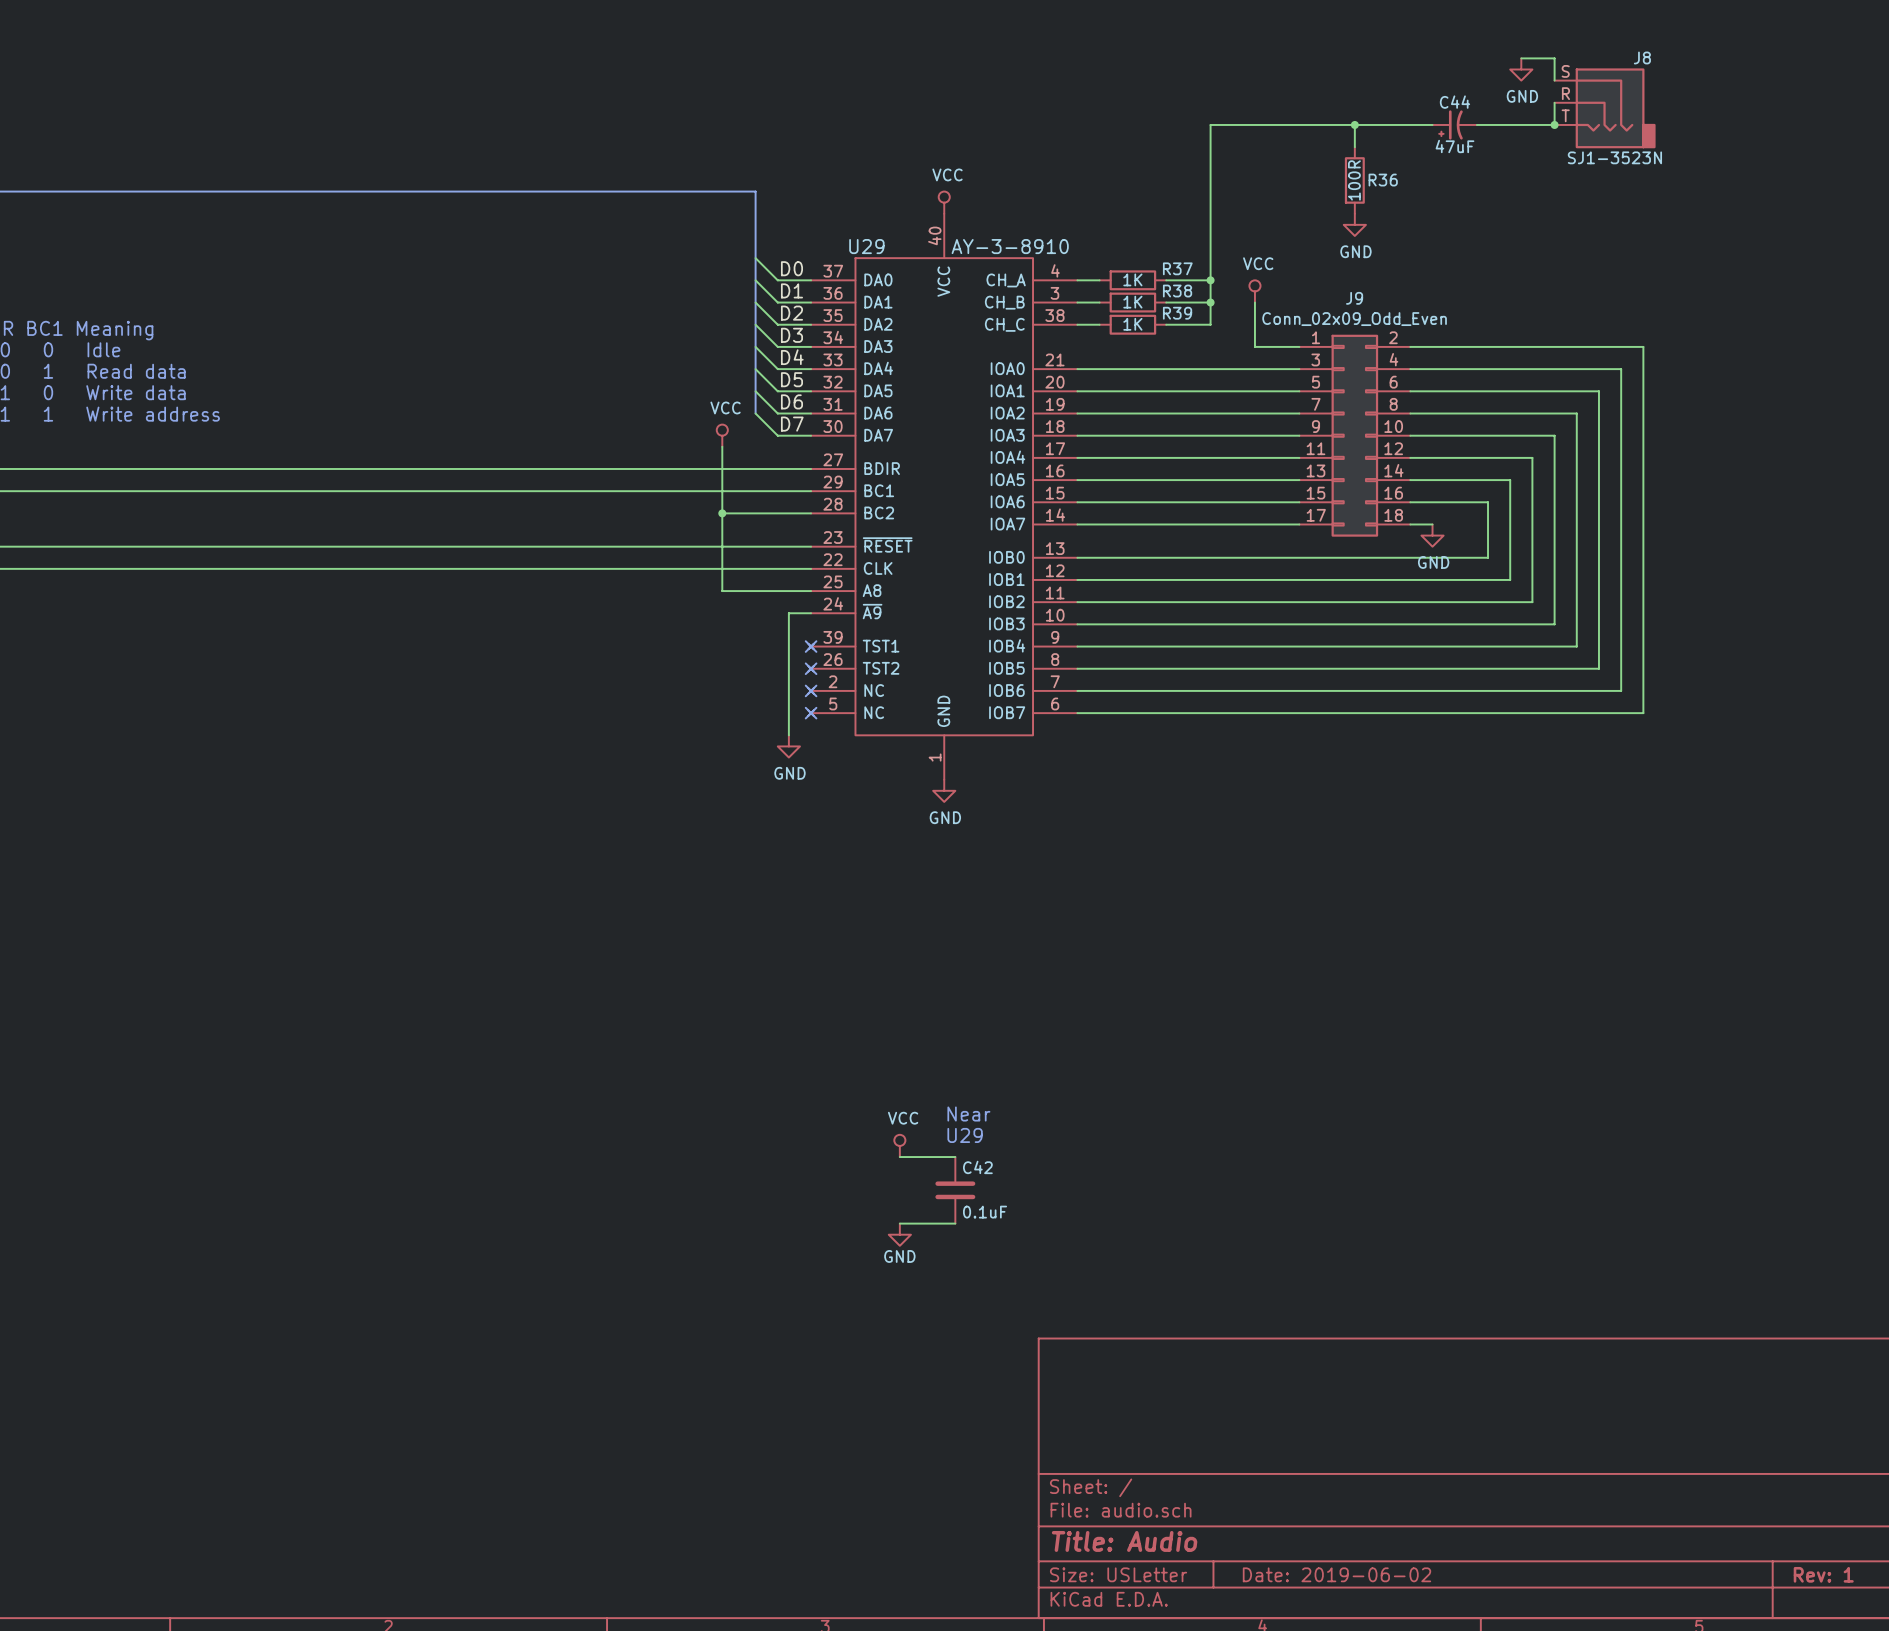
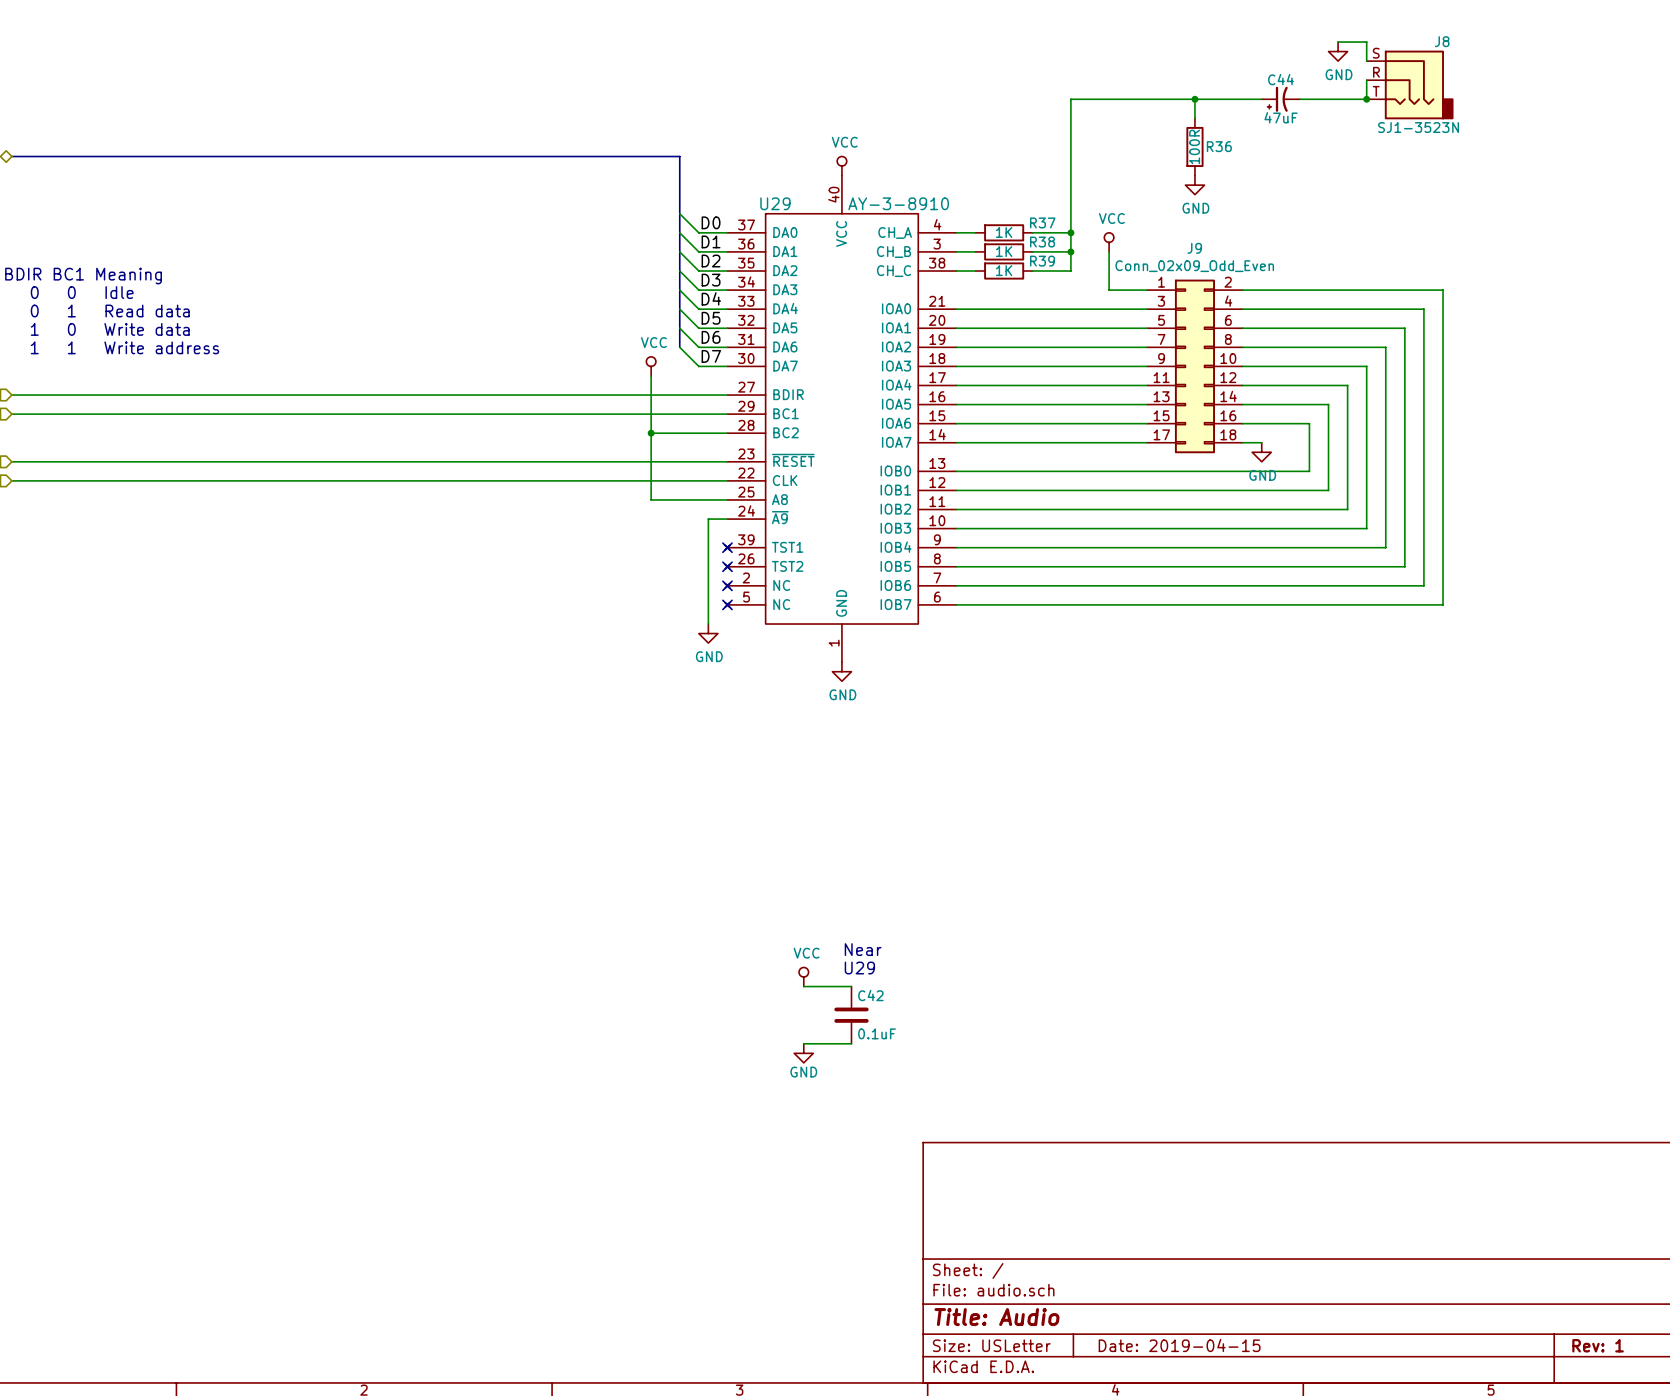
title block: Date: 2019-06-02 (1336, 1574) -> Date: 2019-04-15 (1179, 1345)

